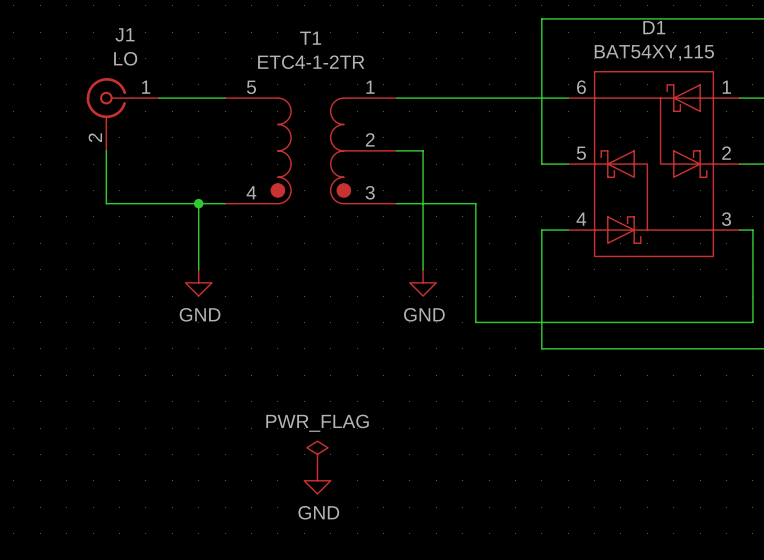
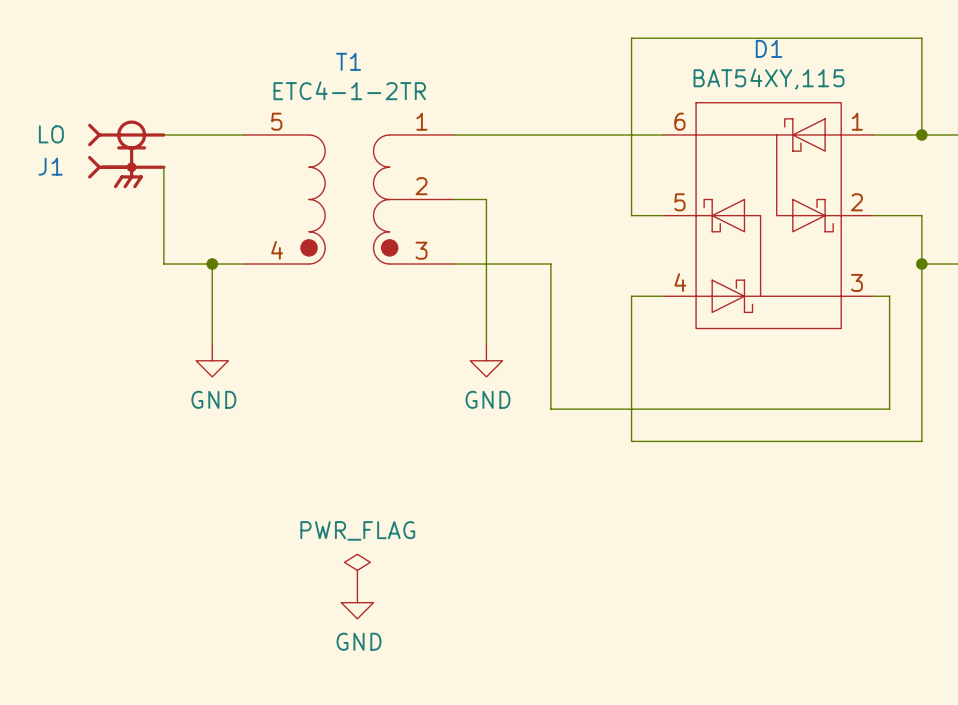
J1 name position: J1 (125, 34) -> J1 (50, 166)
J1 value position: LO (125, 58) -> LO (51, 134)
J1 symbol: [86, 78, 160, 151] -> [88, 120, 166, 189]
wire: (106, 150) (106, 203) (159, 203) -> (163, 167) (163, 264)

